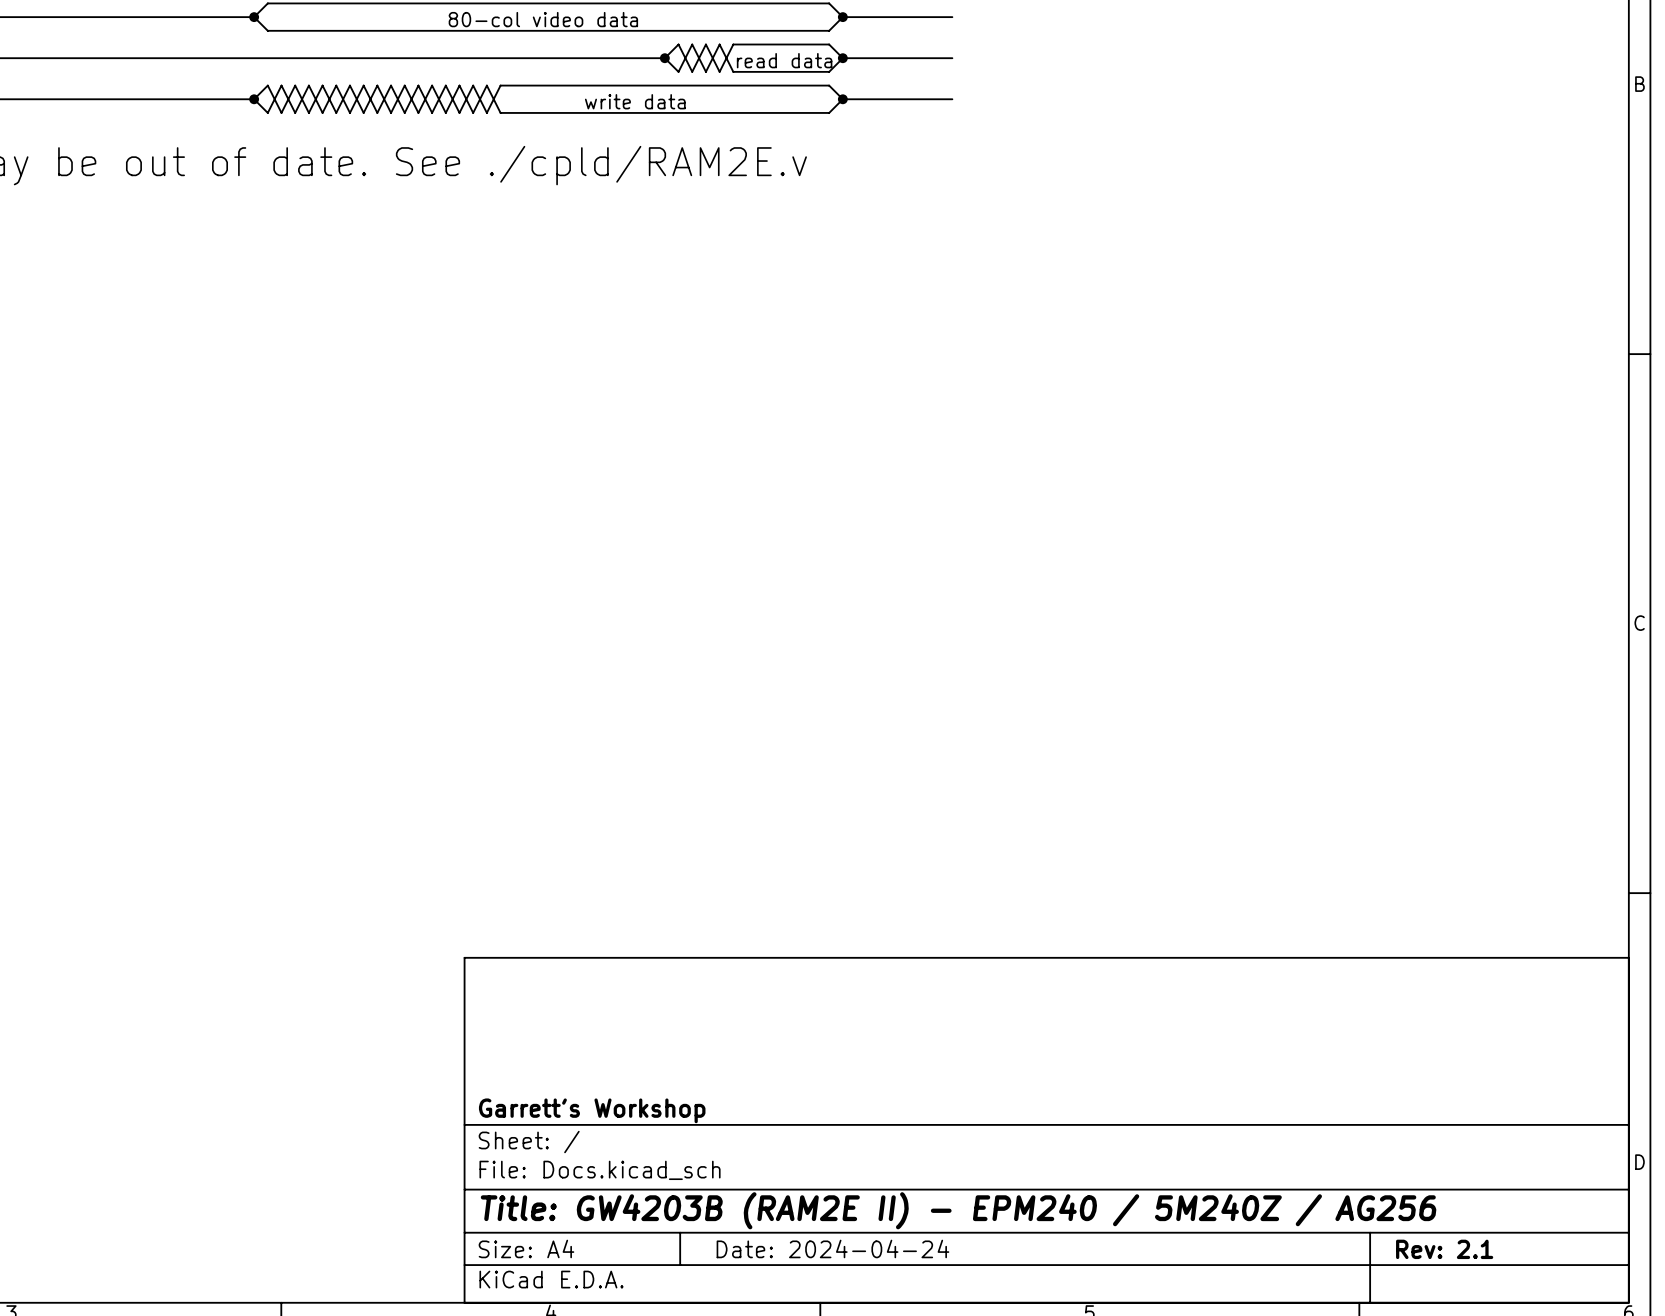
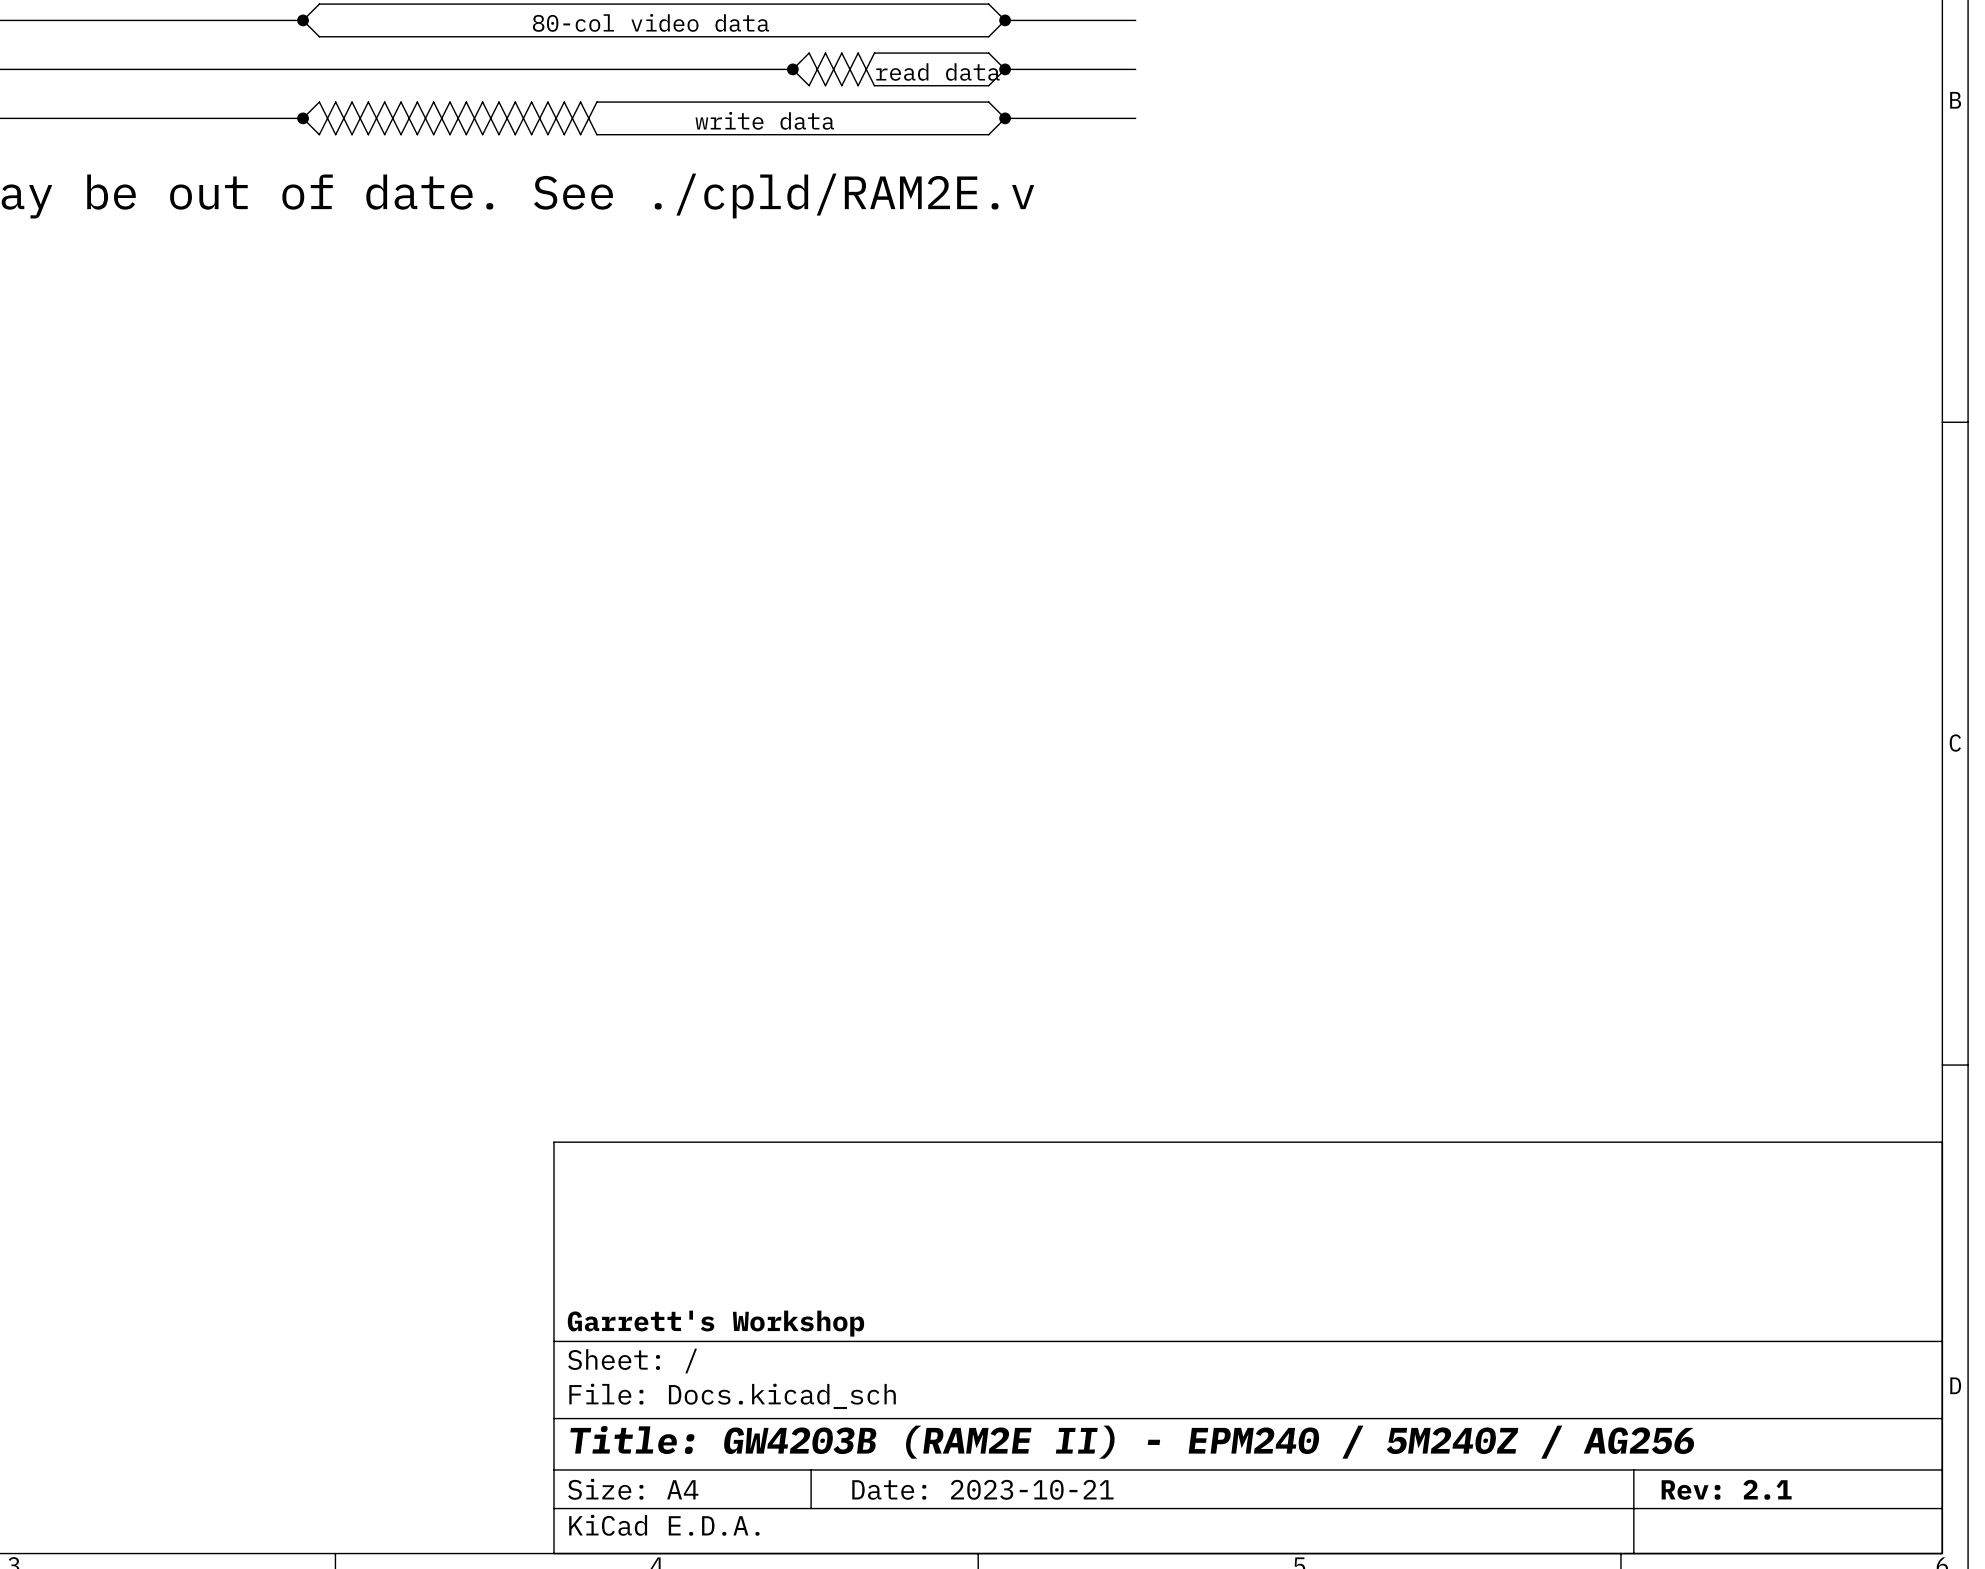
title block: Date: 2024-04-24 (832, 1248) -> Date: 2023-10-21 (982, 1489)

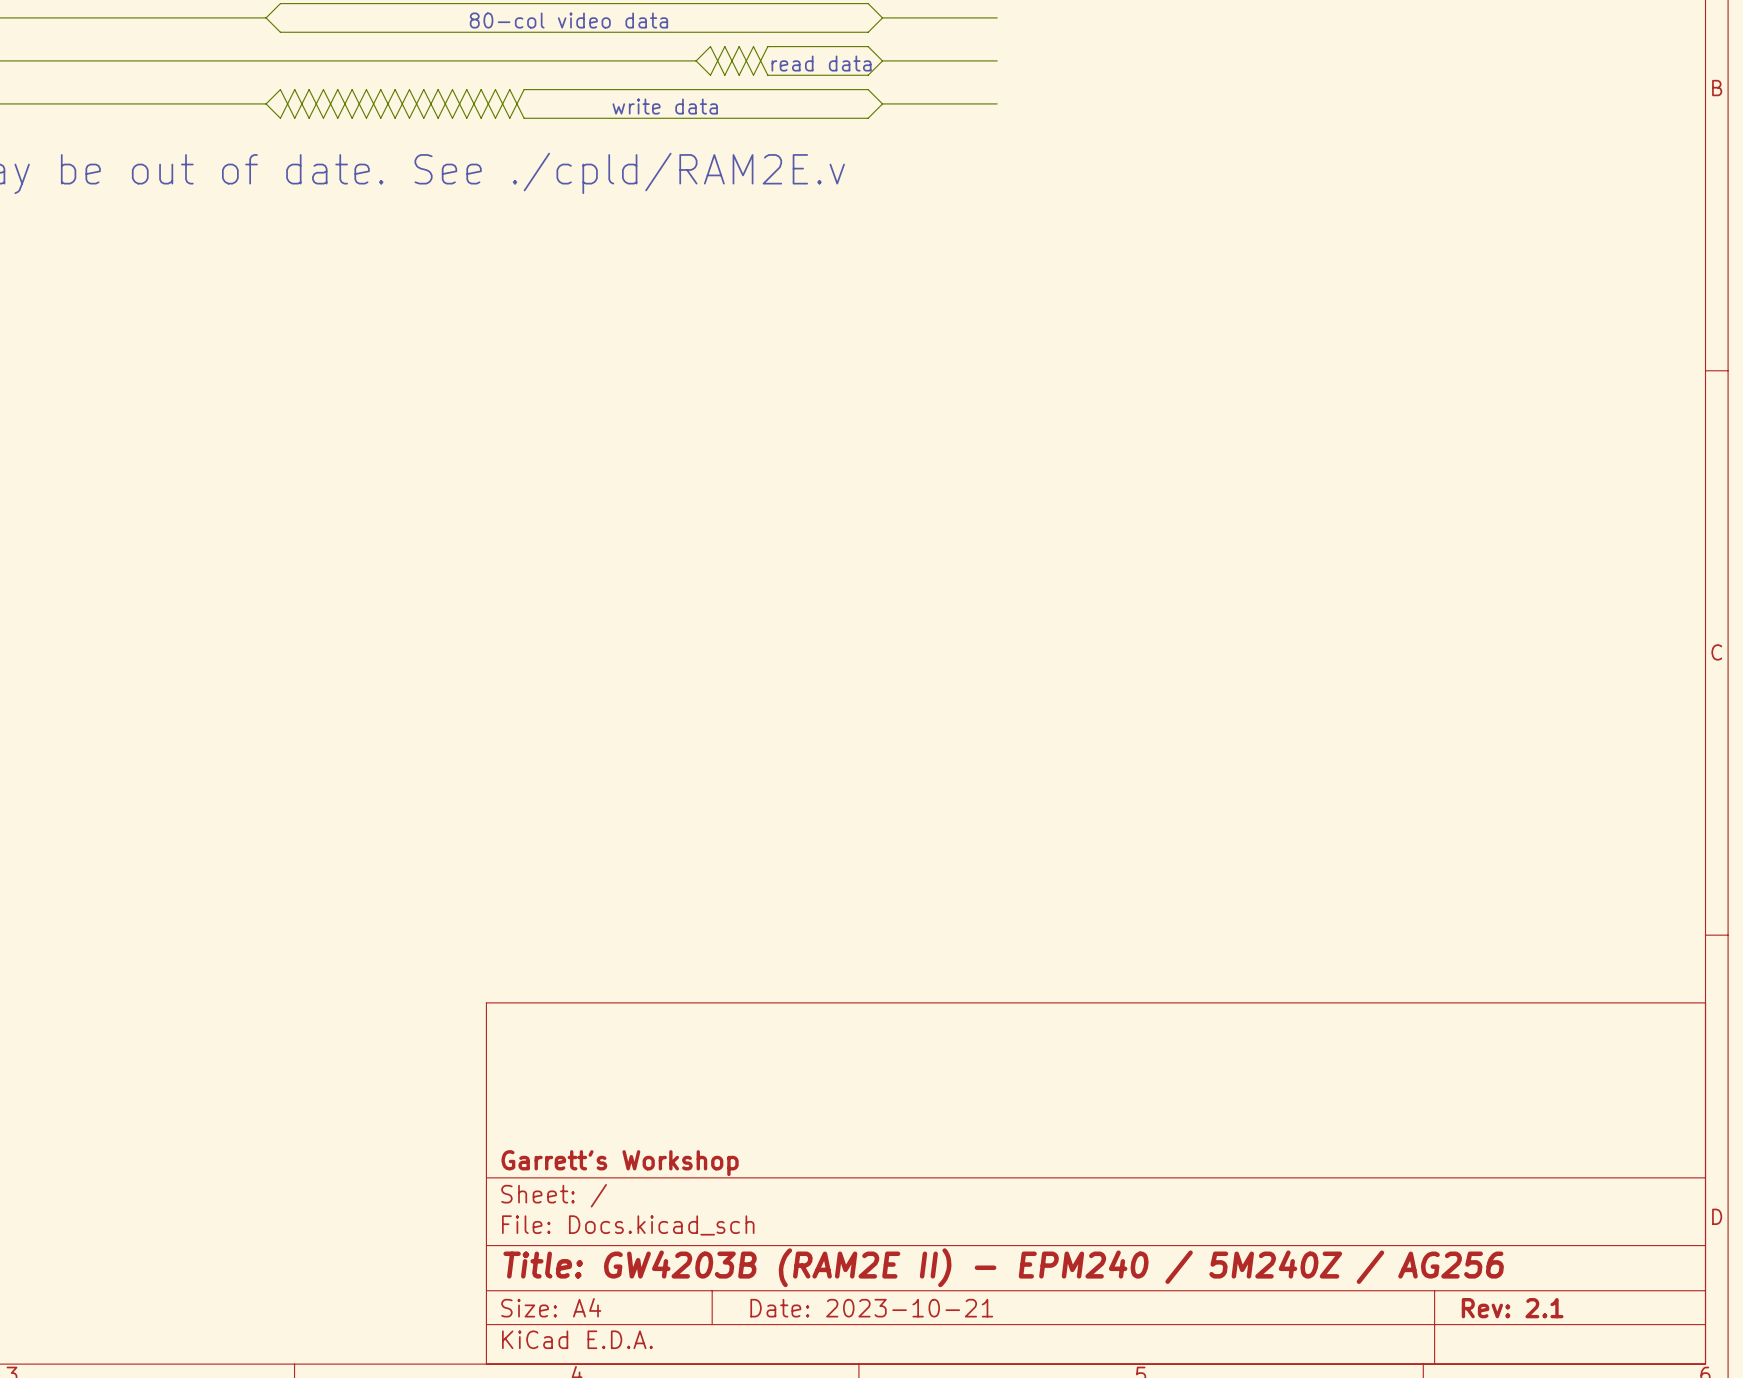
junction: (303, 20) -> none
junction: (1005, 20) -> none
junction: (792, 69) -> none
junction: (1005, 69) -> none
junction: (303, 118) -> none
junction: (1005, 118) -> none

